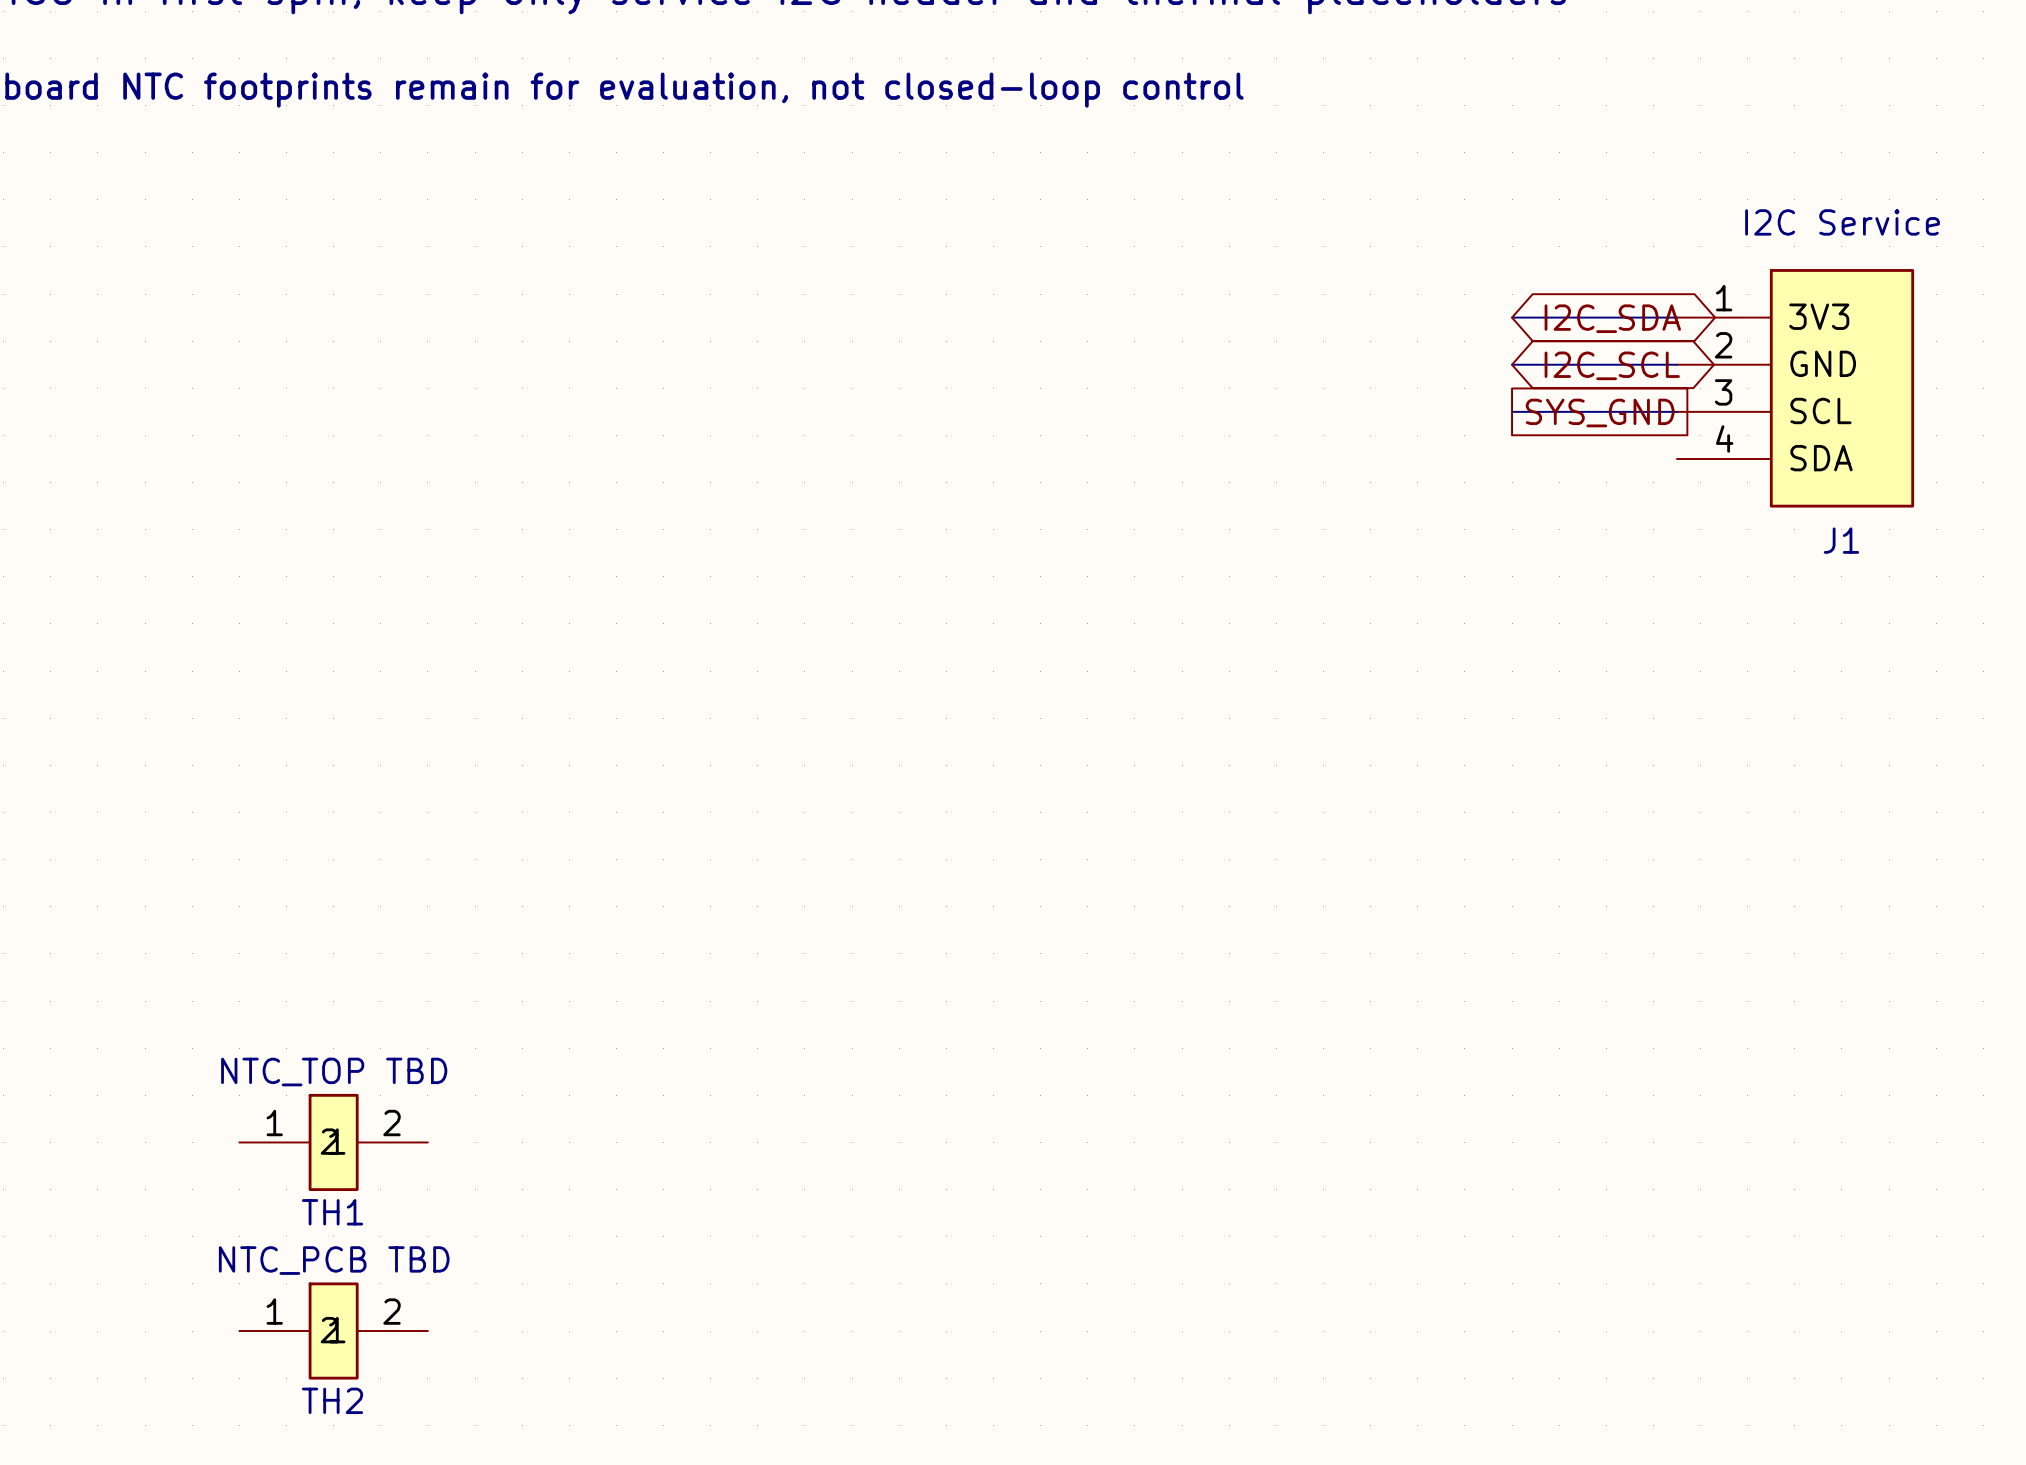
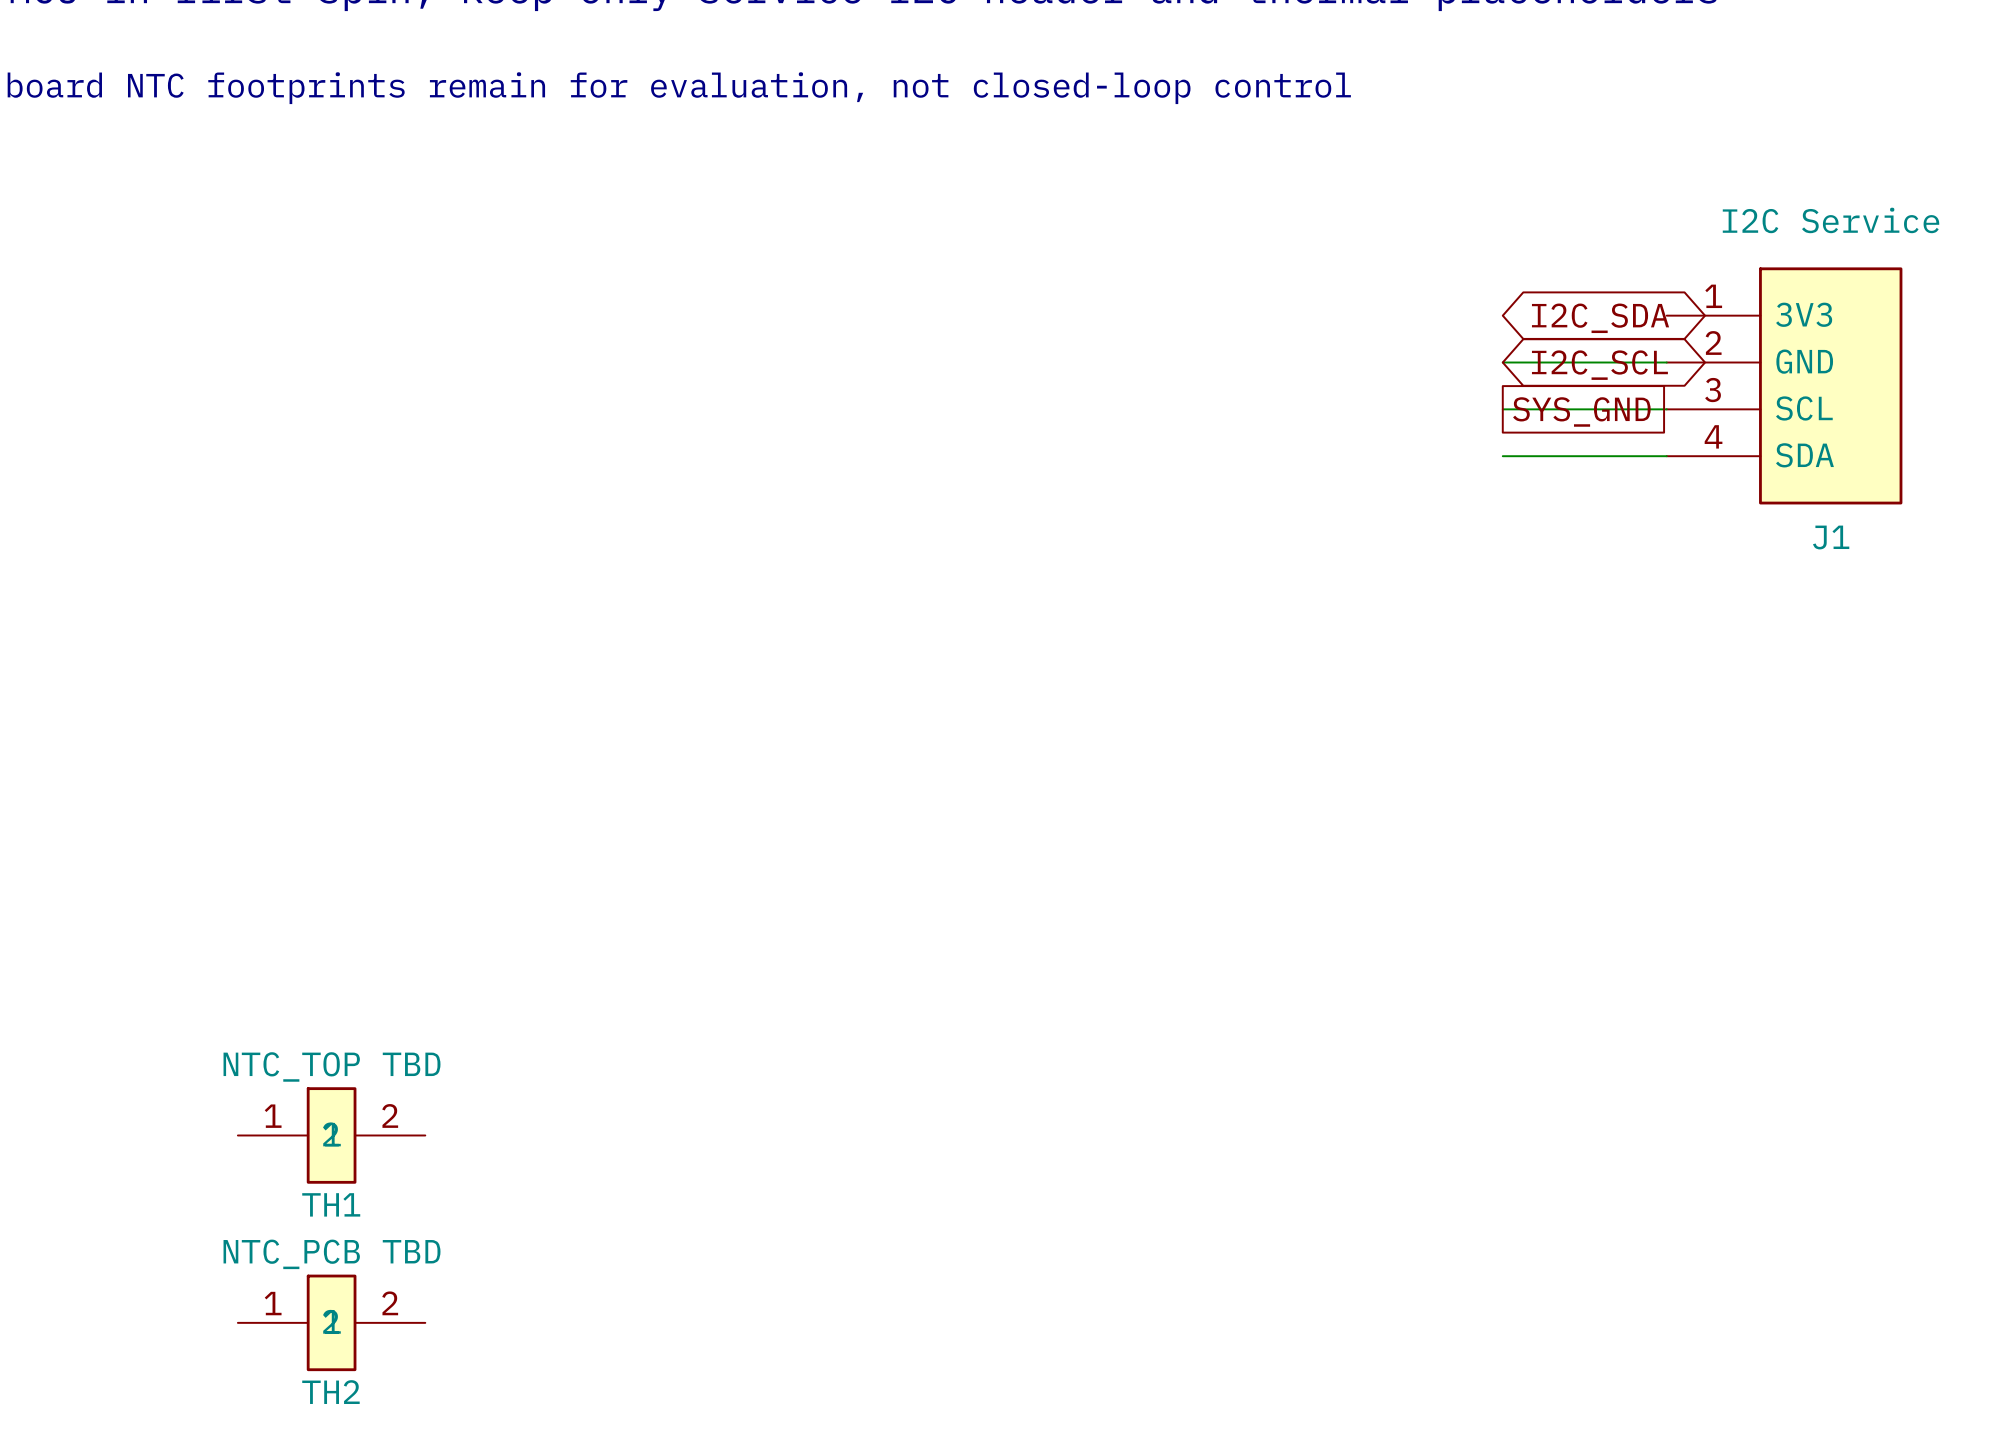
wire: (1512, 317) (1677, 317) -> (1502, 456) (1666, 456)

